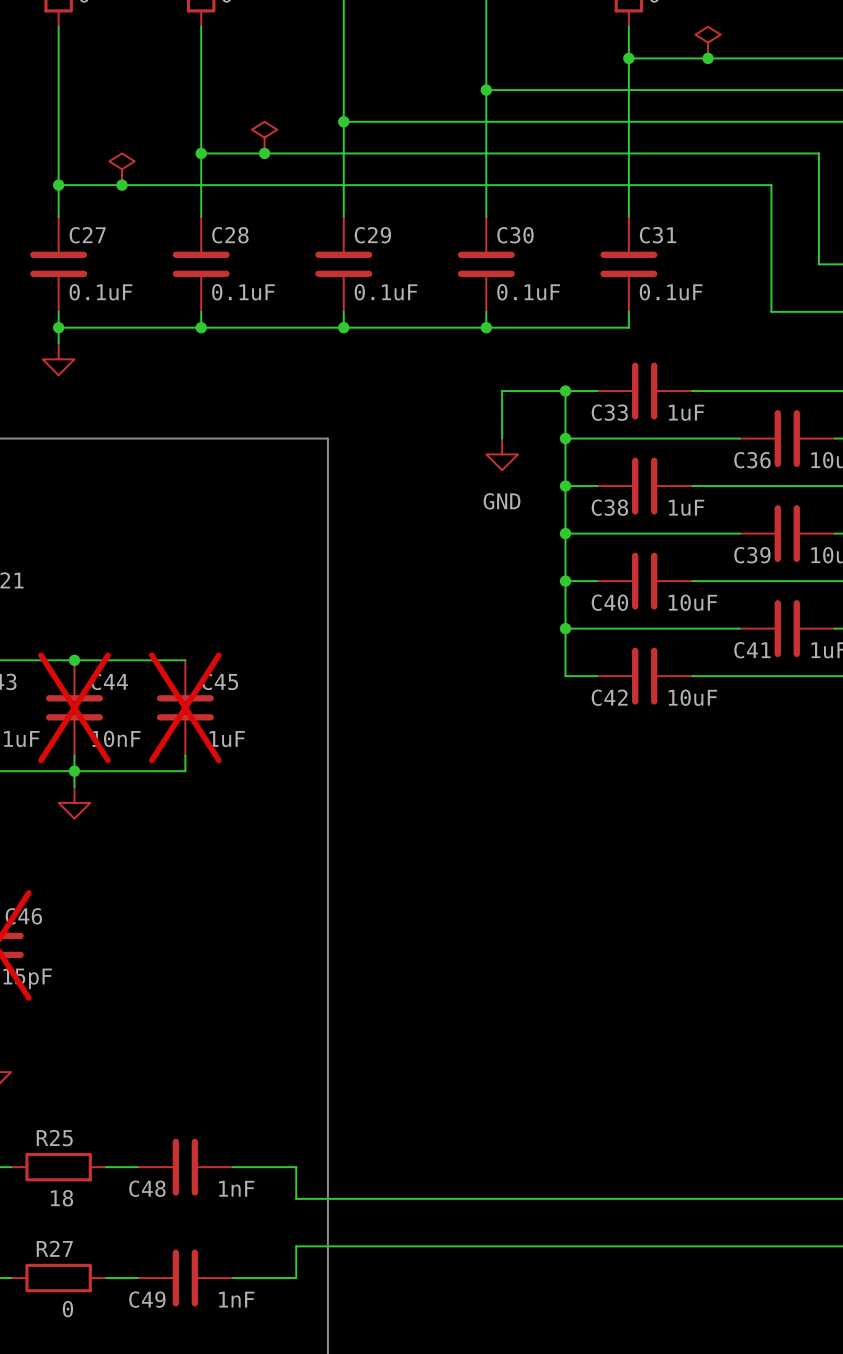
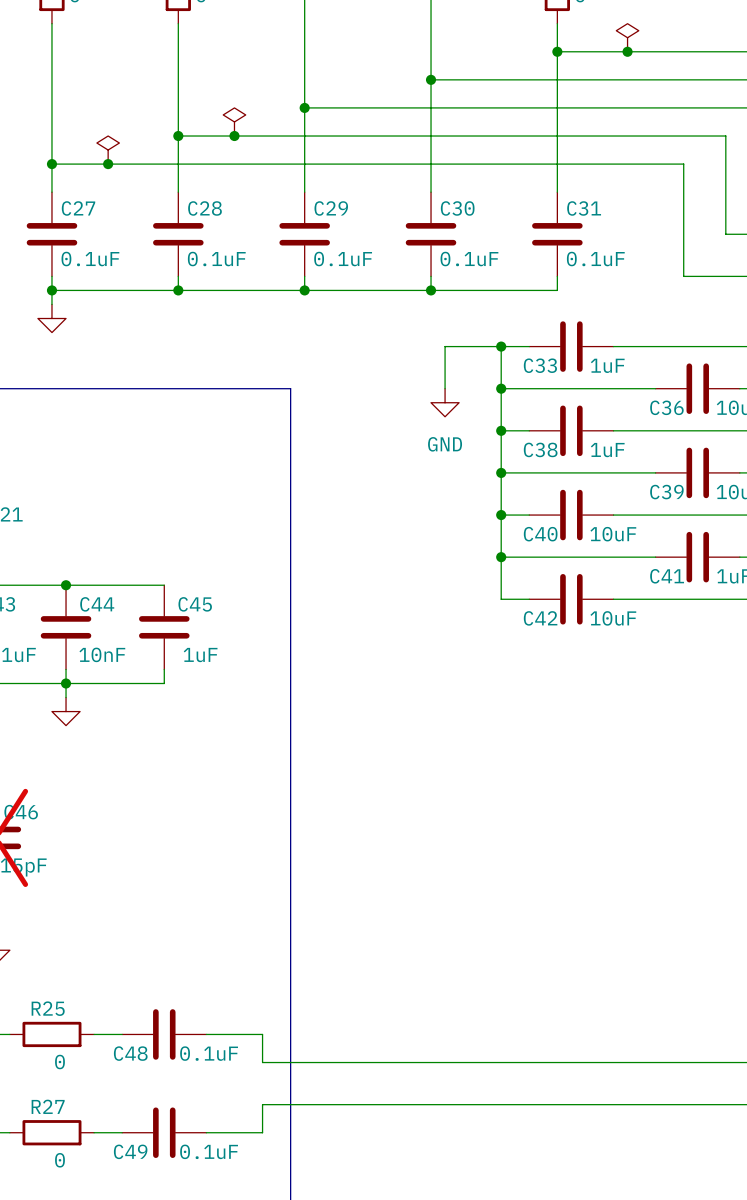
C44 do-not-place cross: (74, 707) -> none
C45 do-not-place cross: (185, 707) -> none
C48 value: 1nF (236, 1188) -> 0.1uF (209, 1053)
R25 value: 18 (62, 1198) -> 0 (59, 1062)
C49 value: 1nF (236, 1299) -> 0.1uF (209, 1151)

